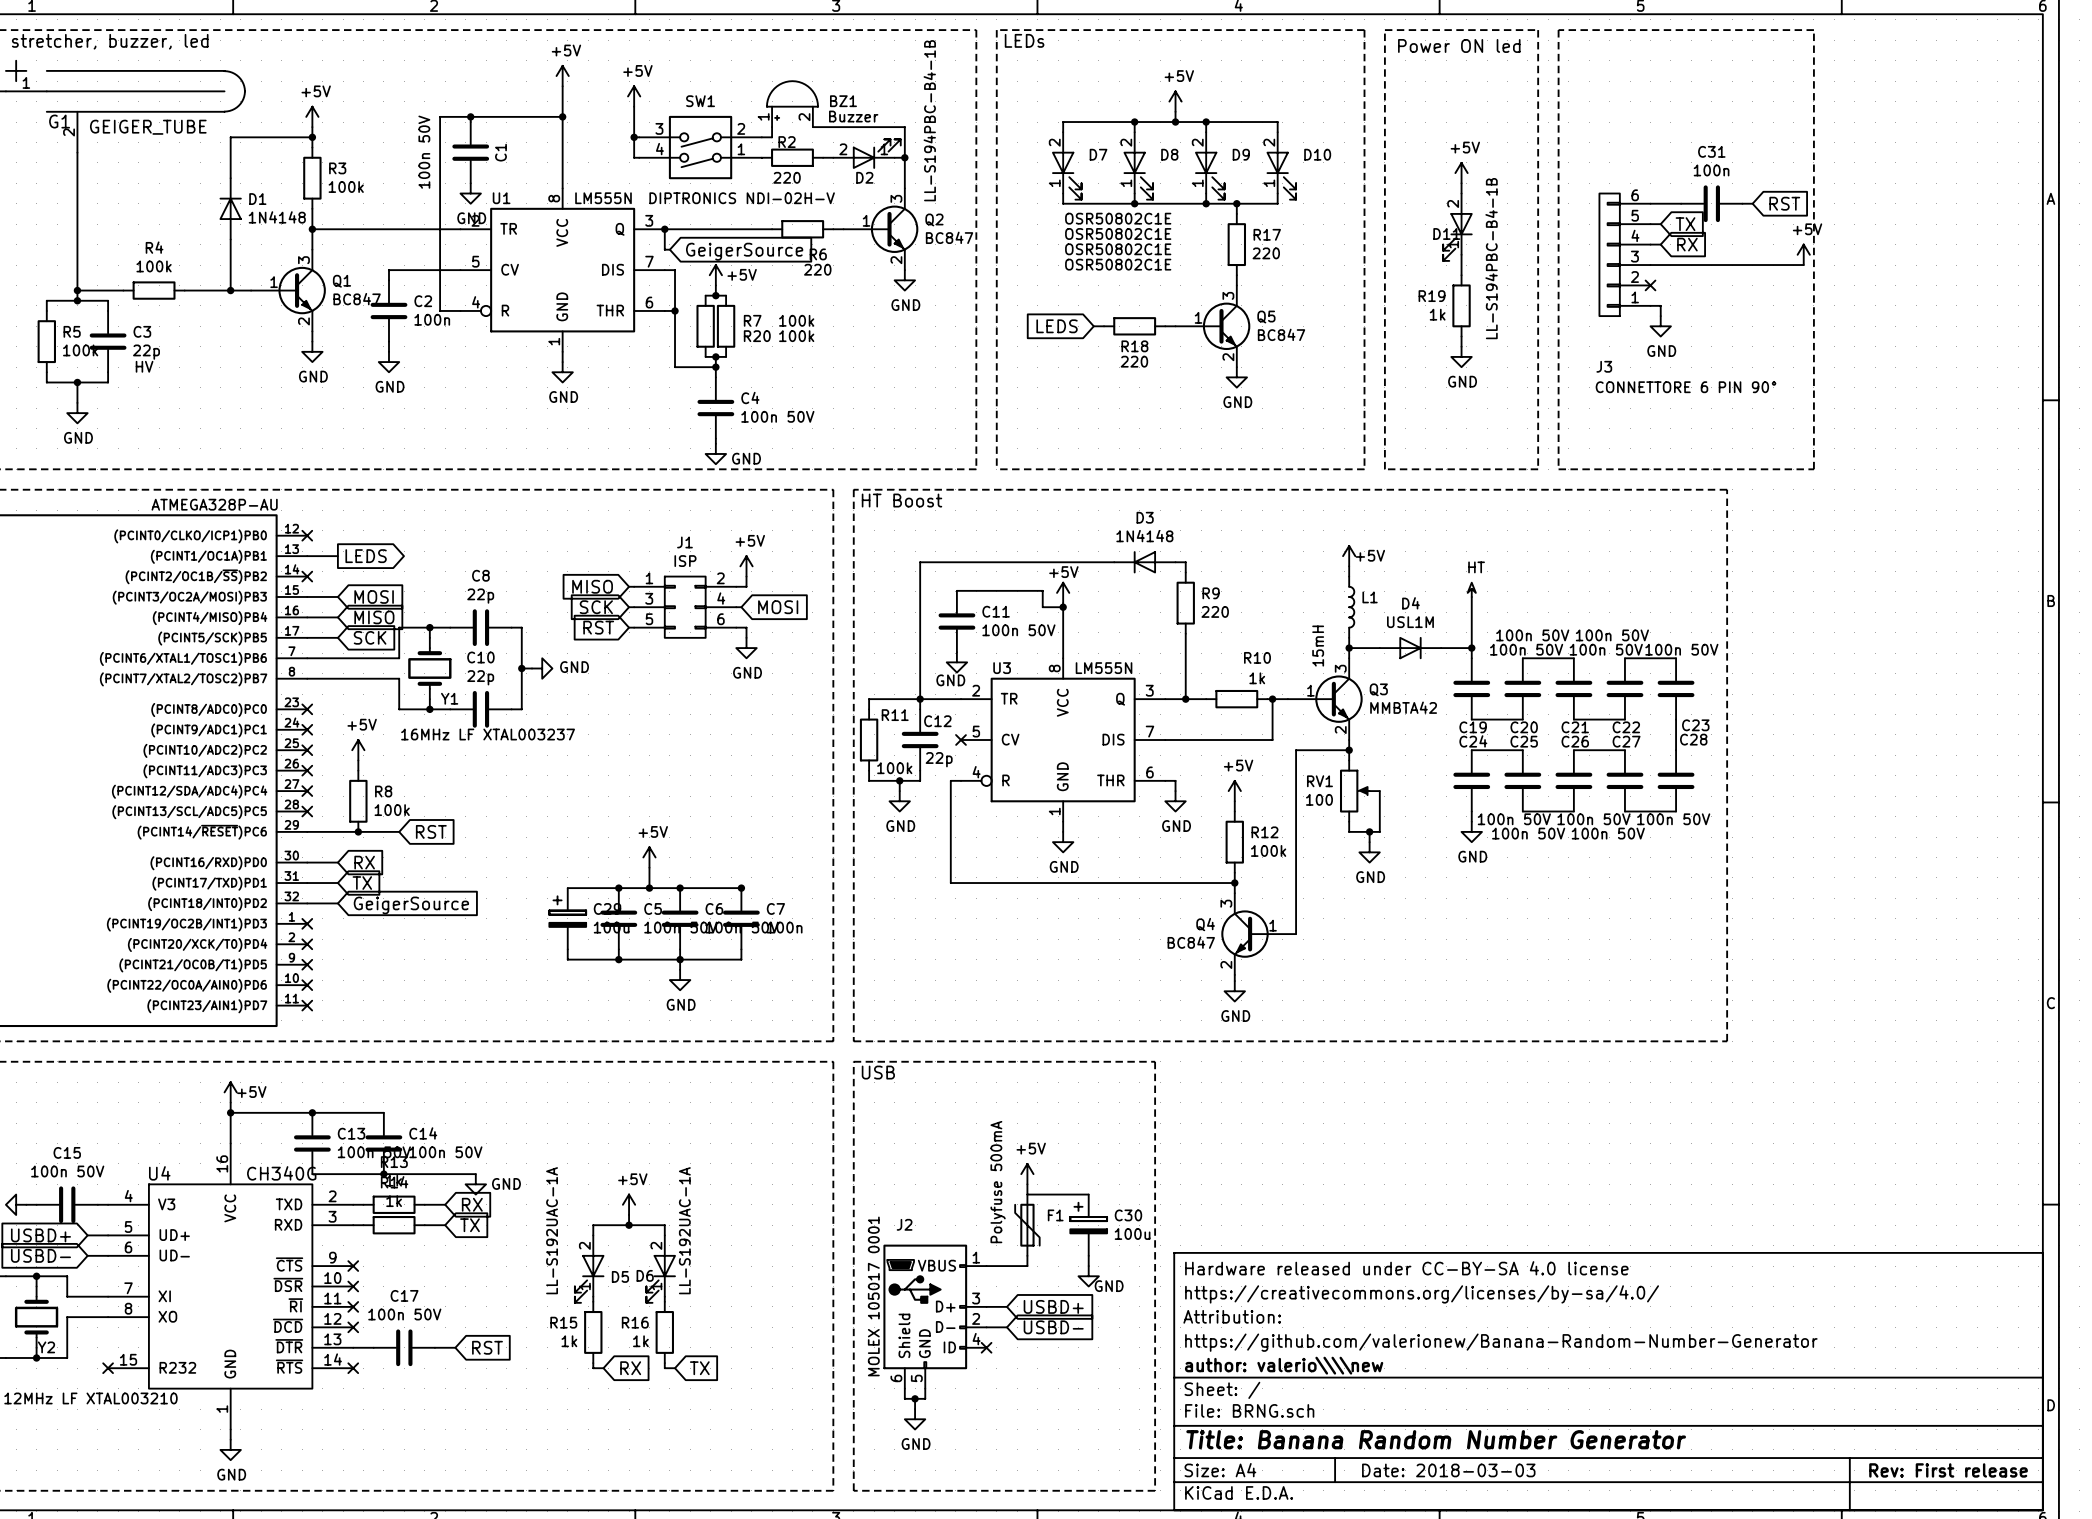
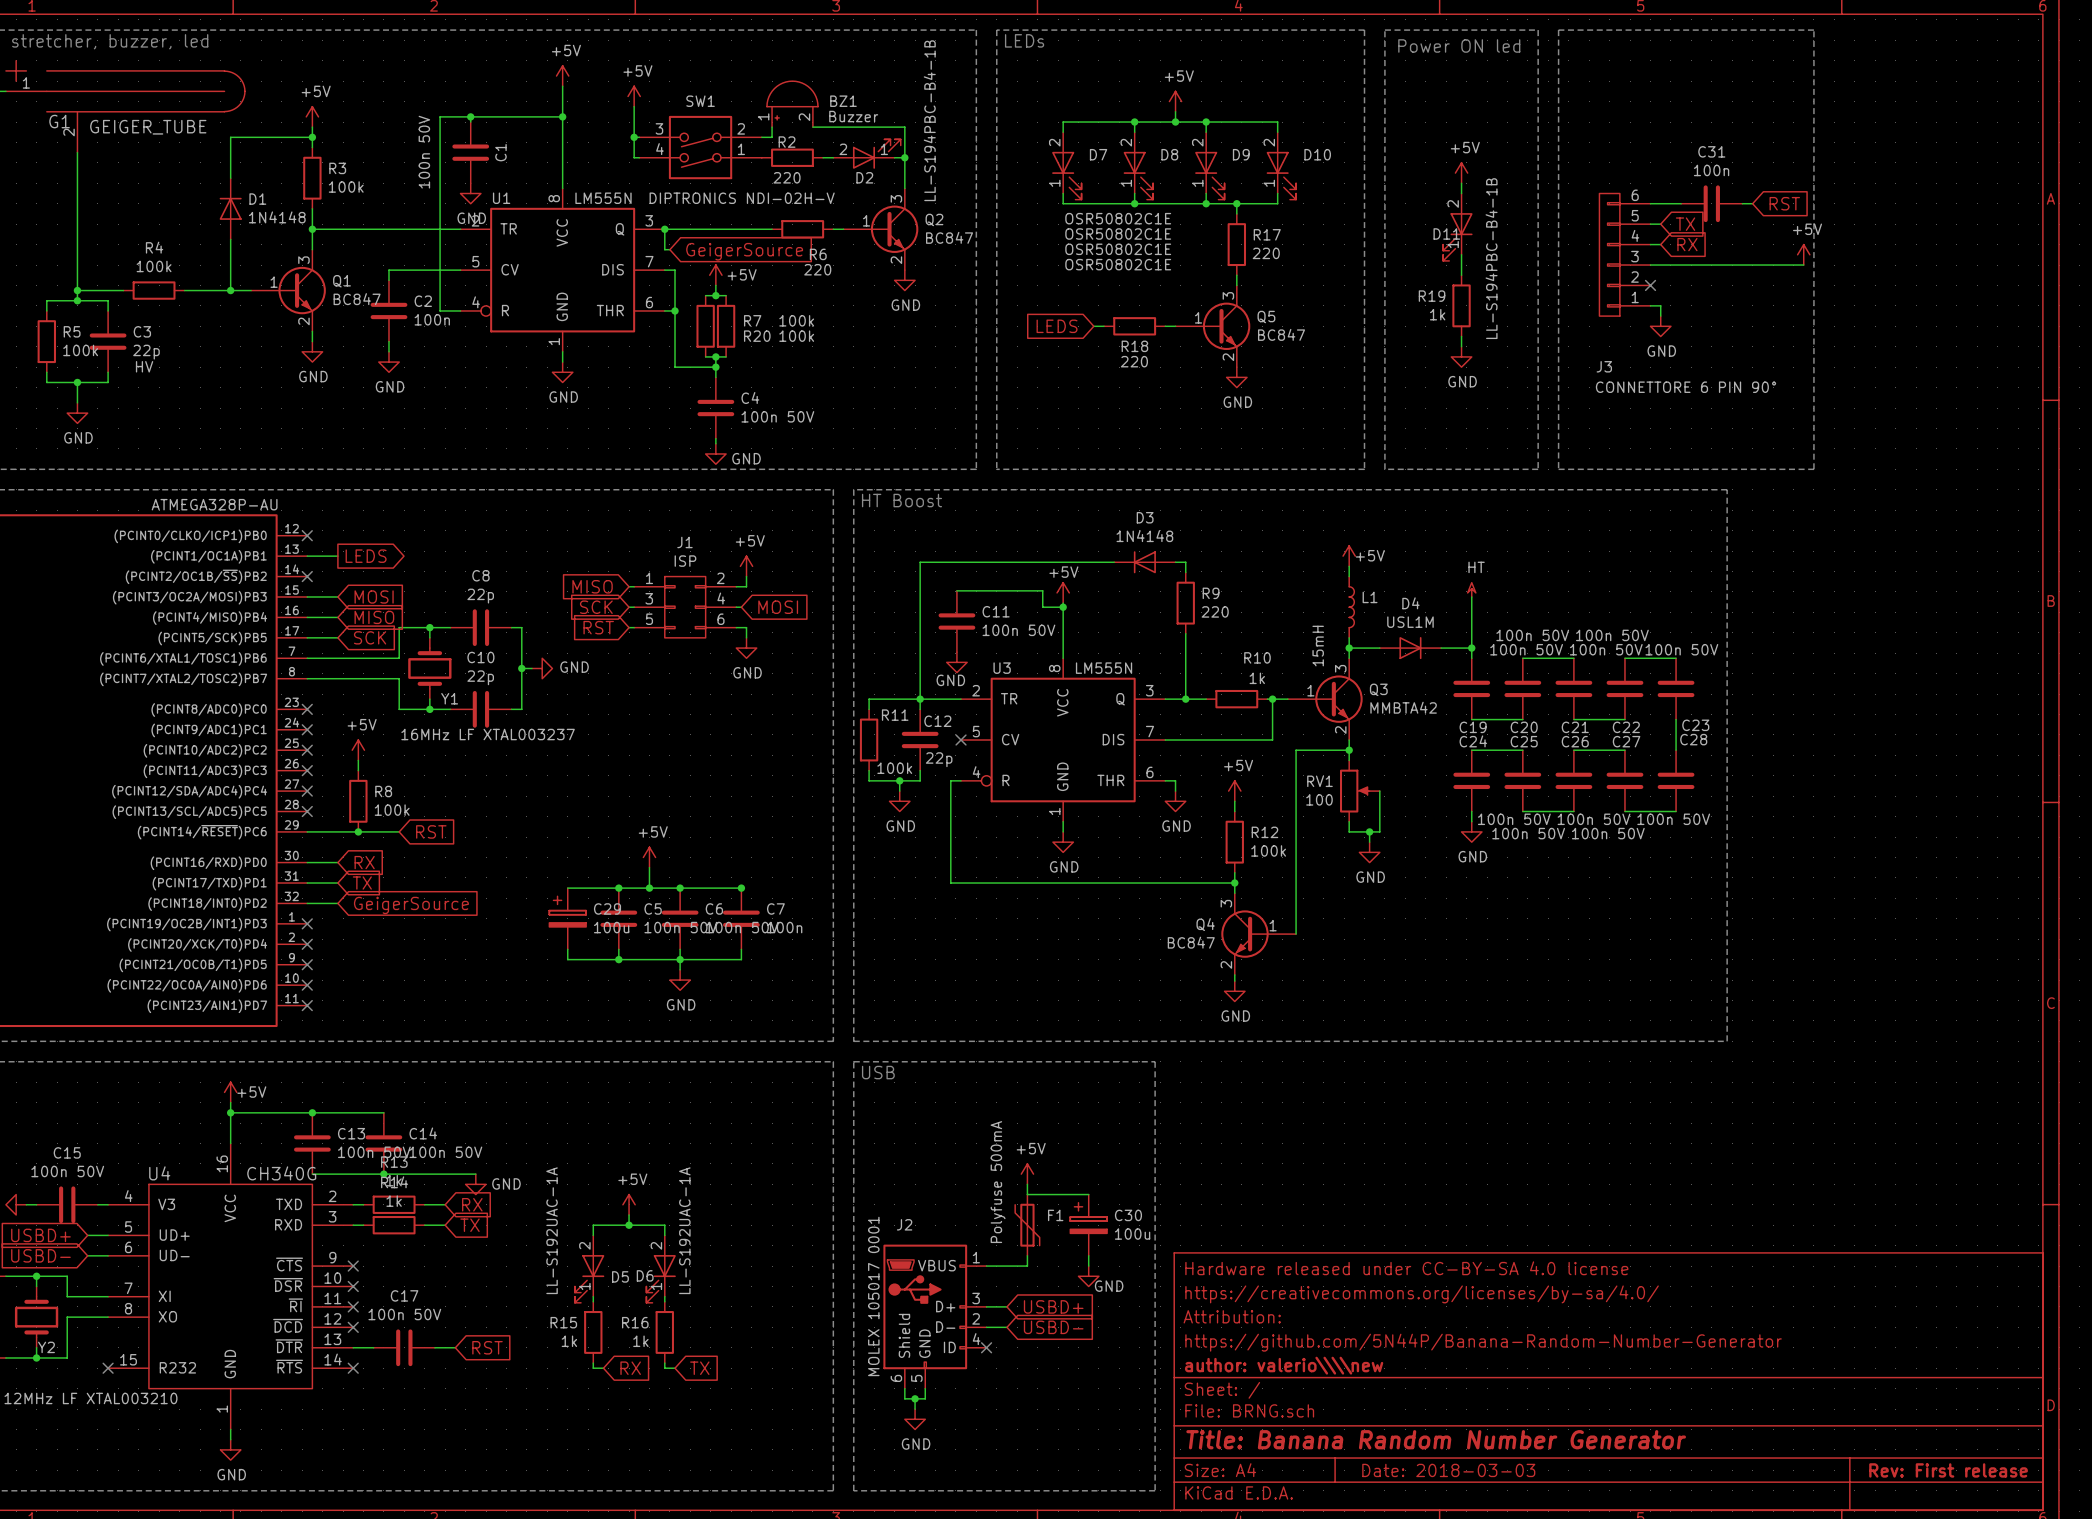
title block: https://github.com/valerionew/Banana-Random-Number-Generator (1501, 1342) -> https://github.com/5N44P/Banana-Random-Number-Generator (1483, 1342)

